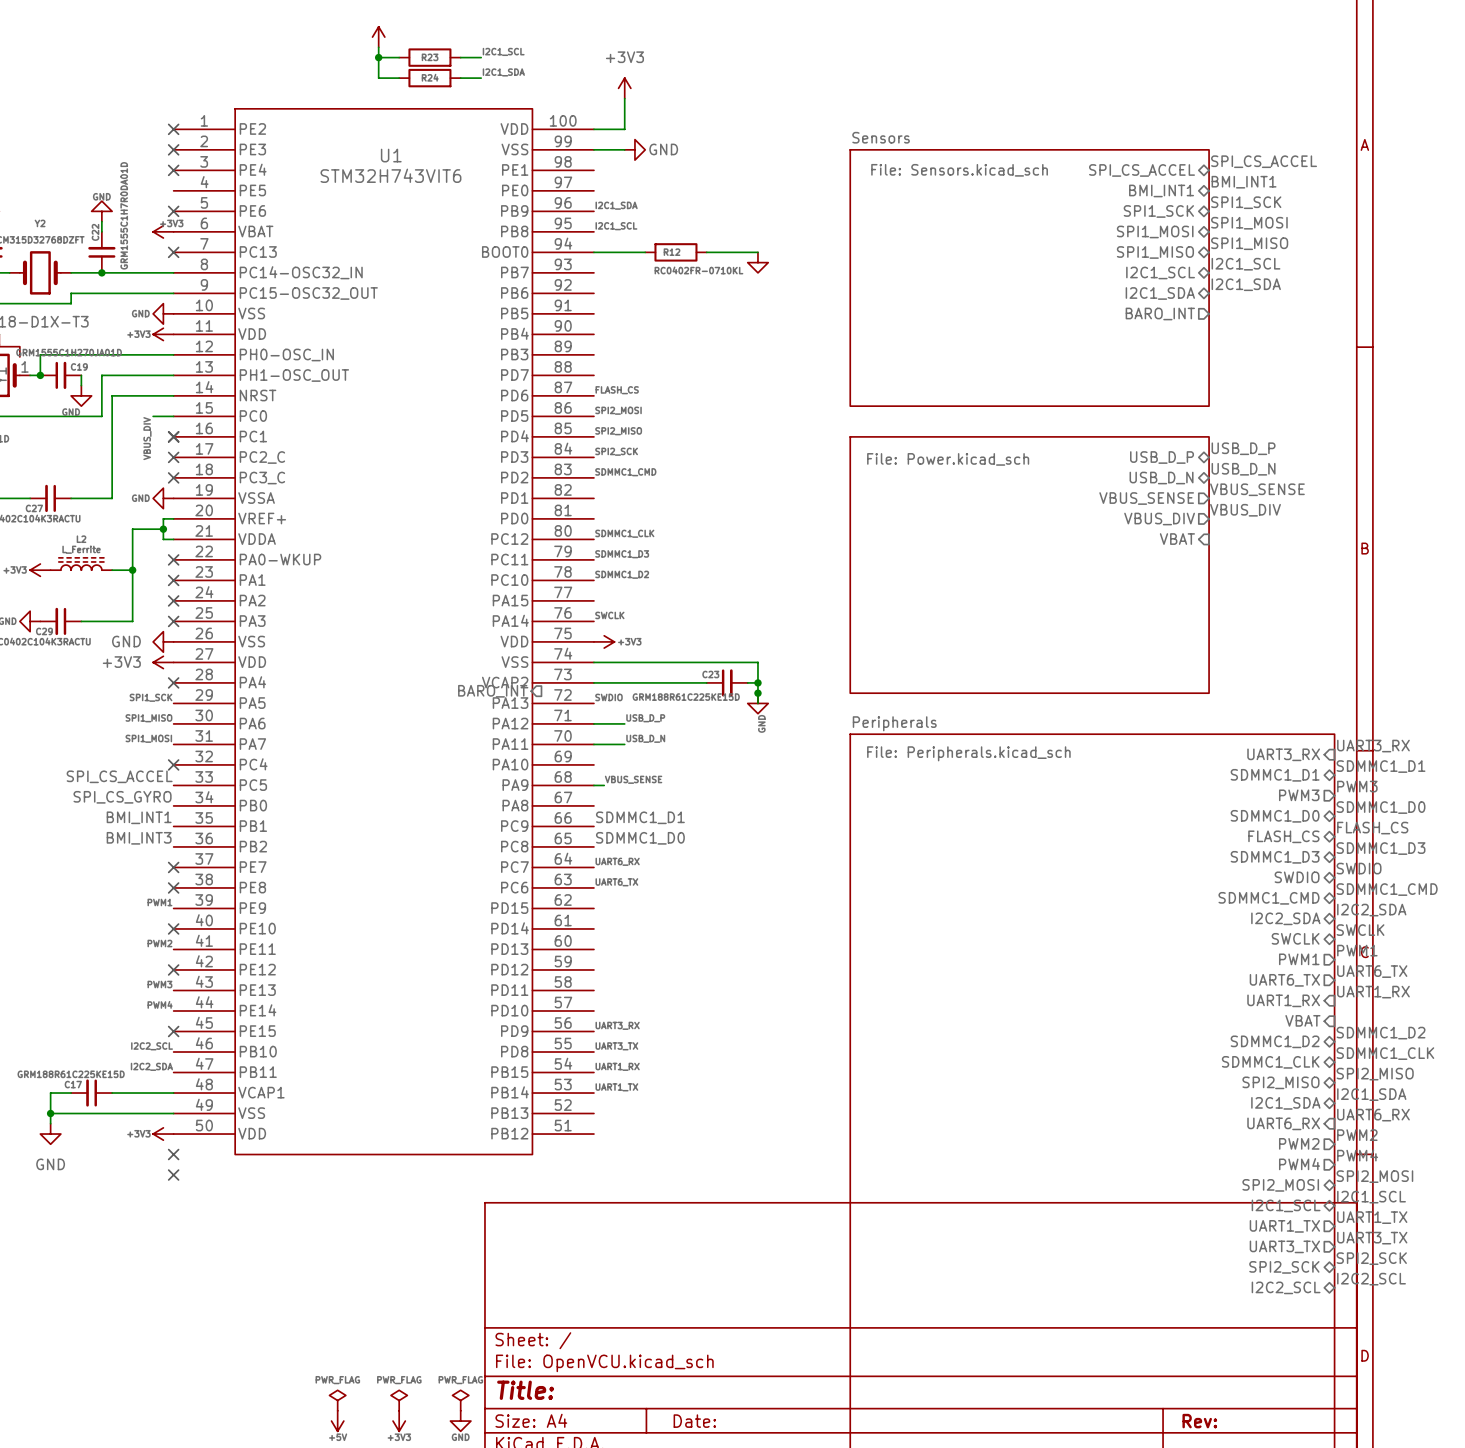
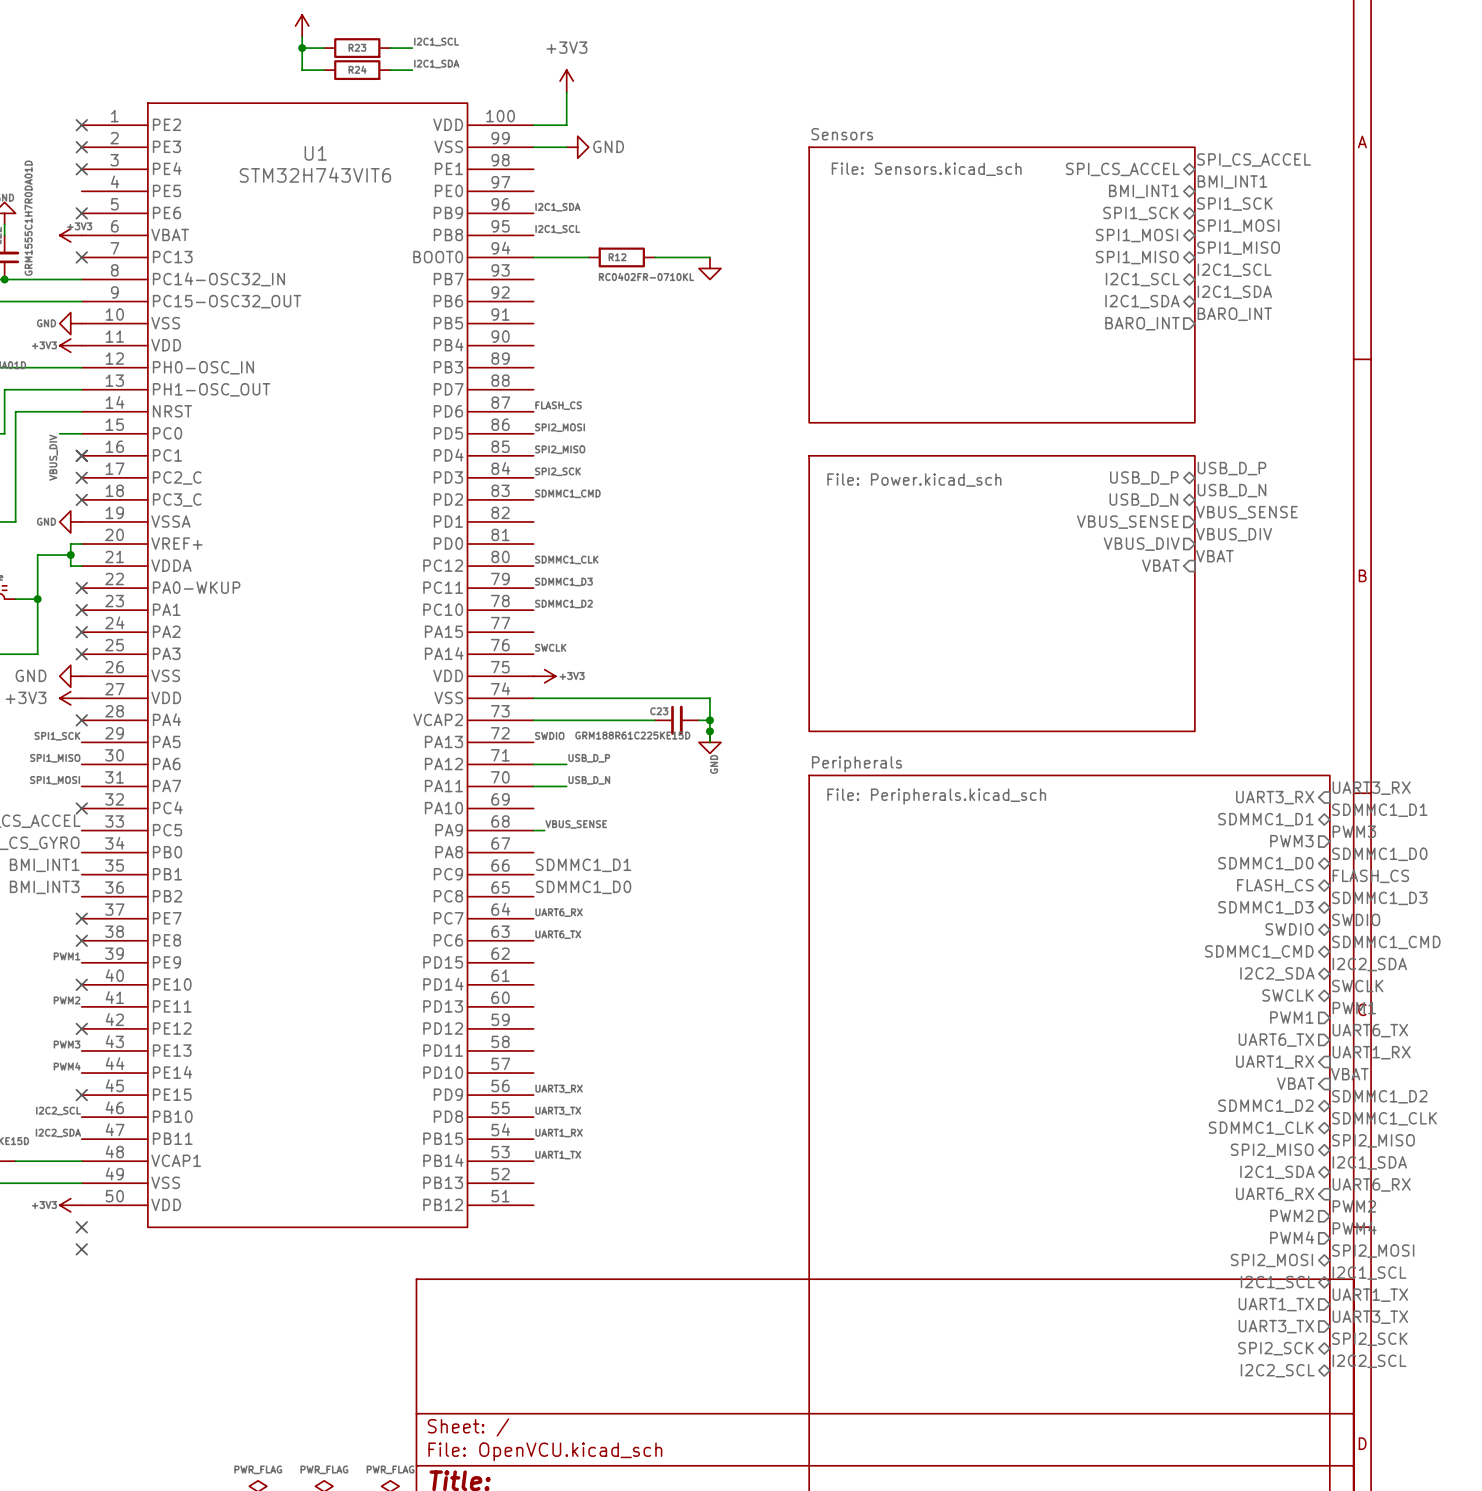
label: none -> BARO_INT (1234, 314)
label: none -> VBAT (1214, 556)
hierarchical label: BARO_INT (492, 691) -> none
label: none -> VBAT (1349, 1074)

